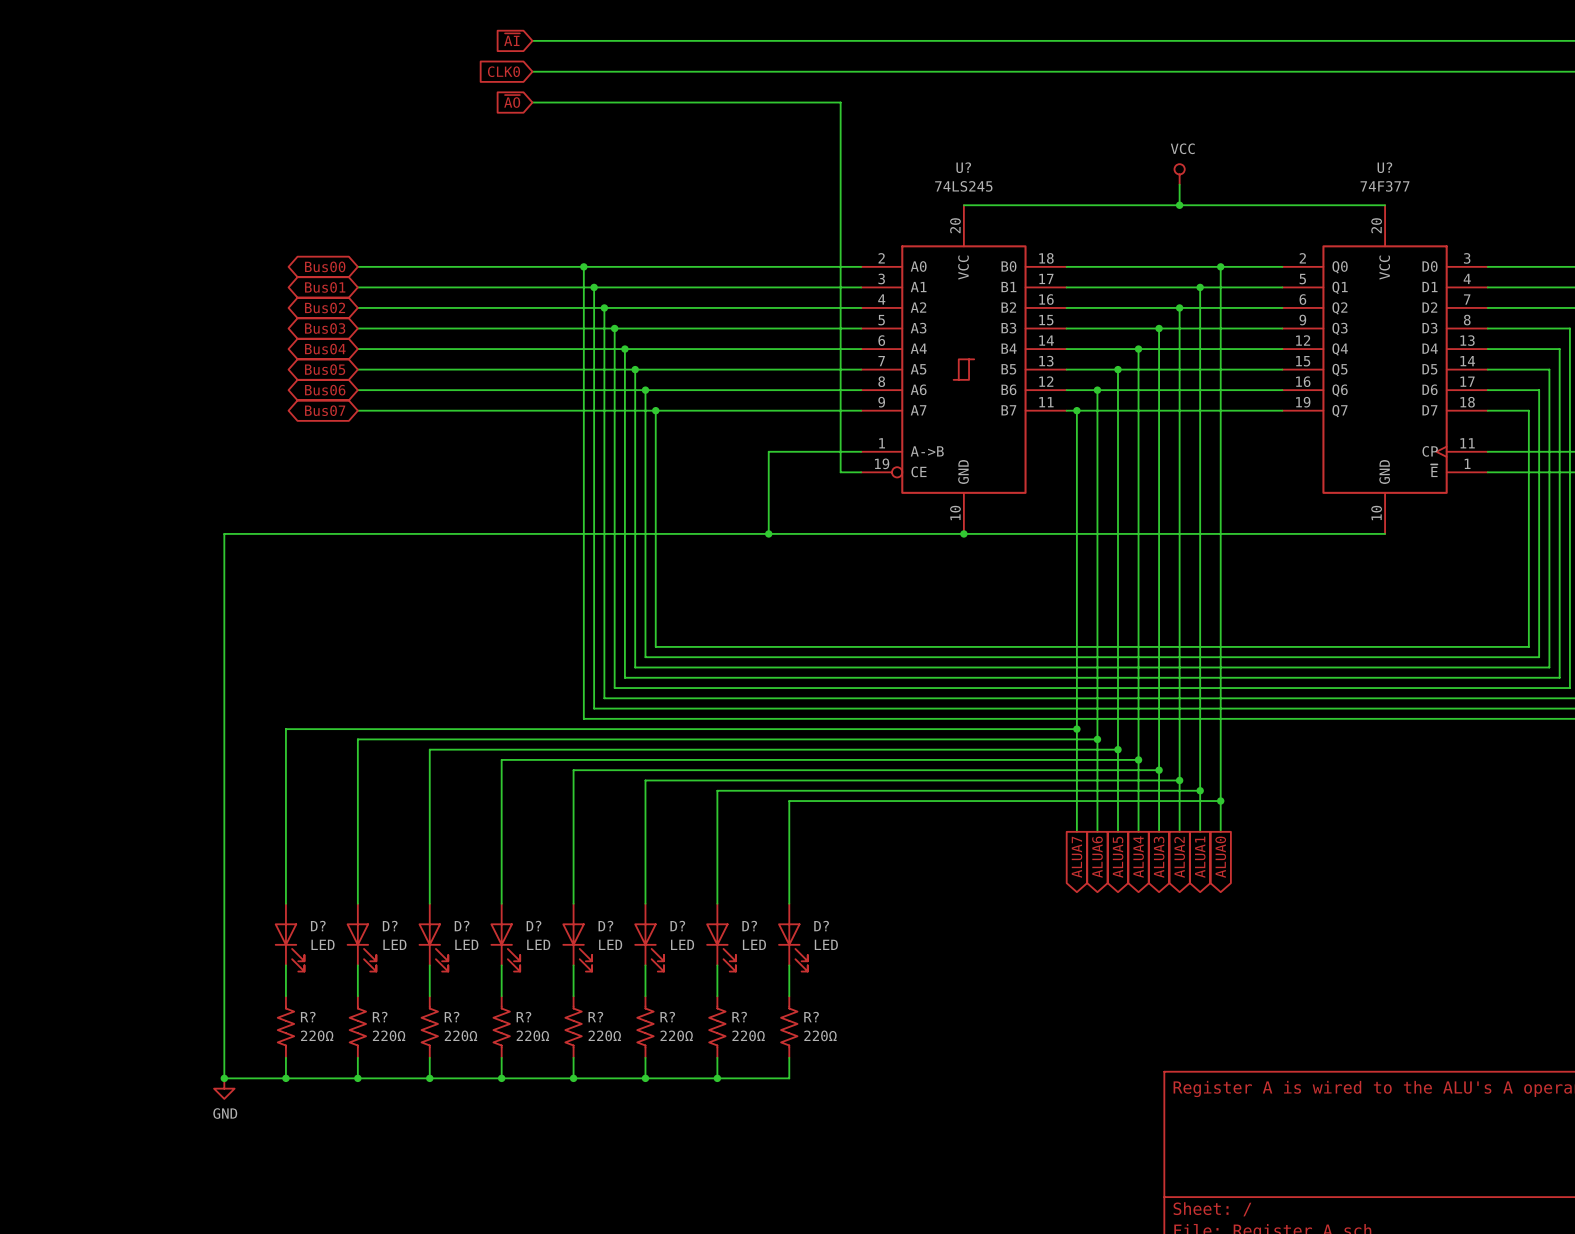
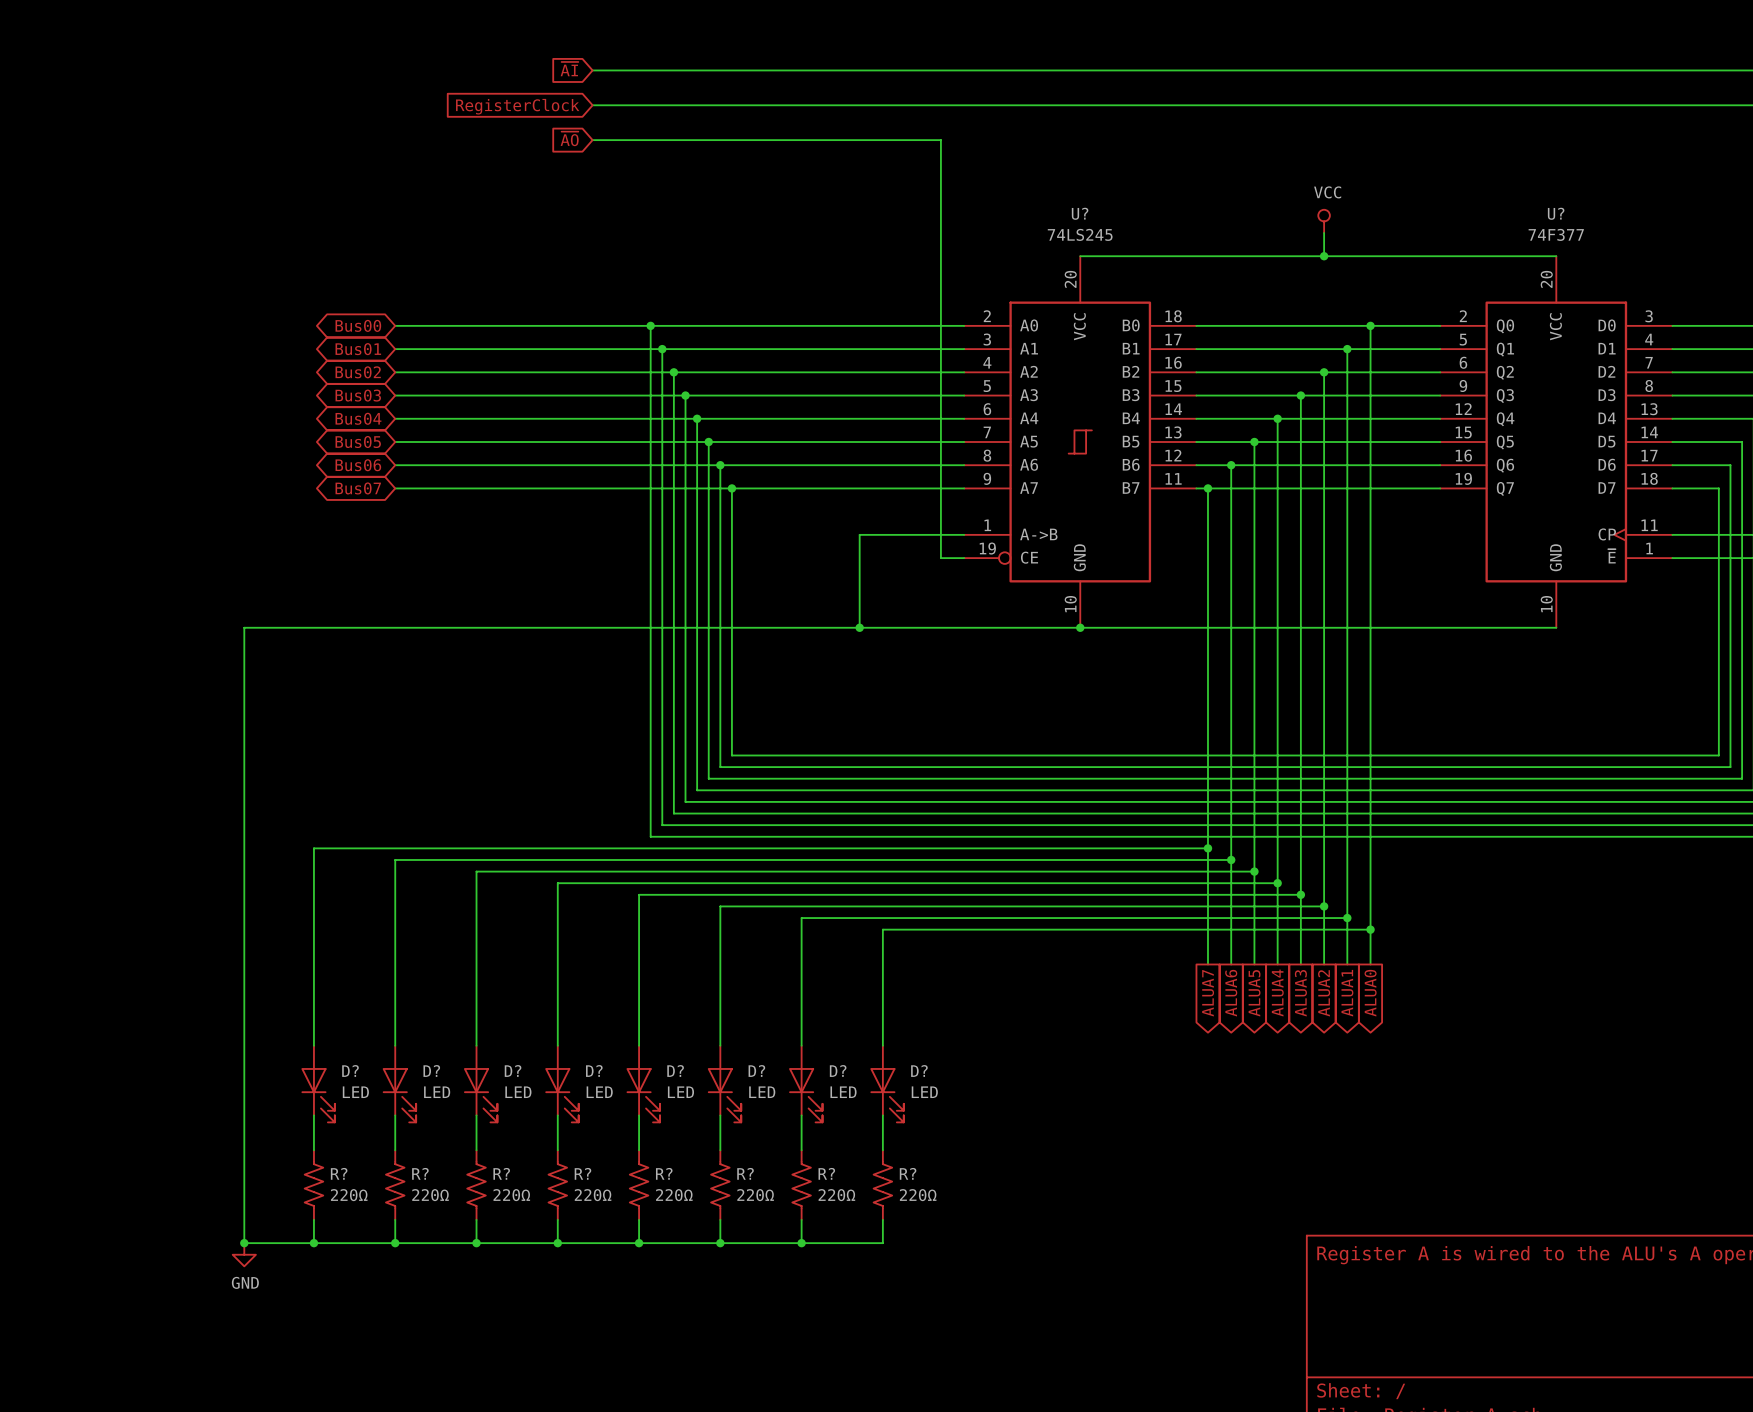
global label: CLK0 (503, 71) -> RegisterClock (517, 106)

